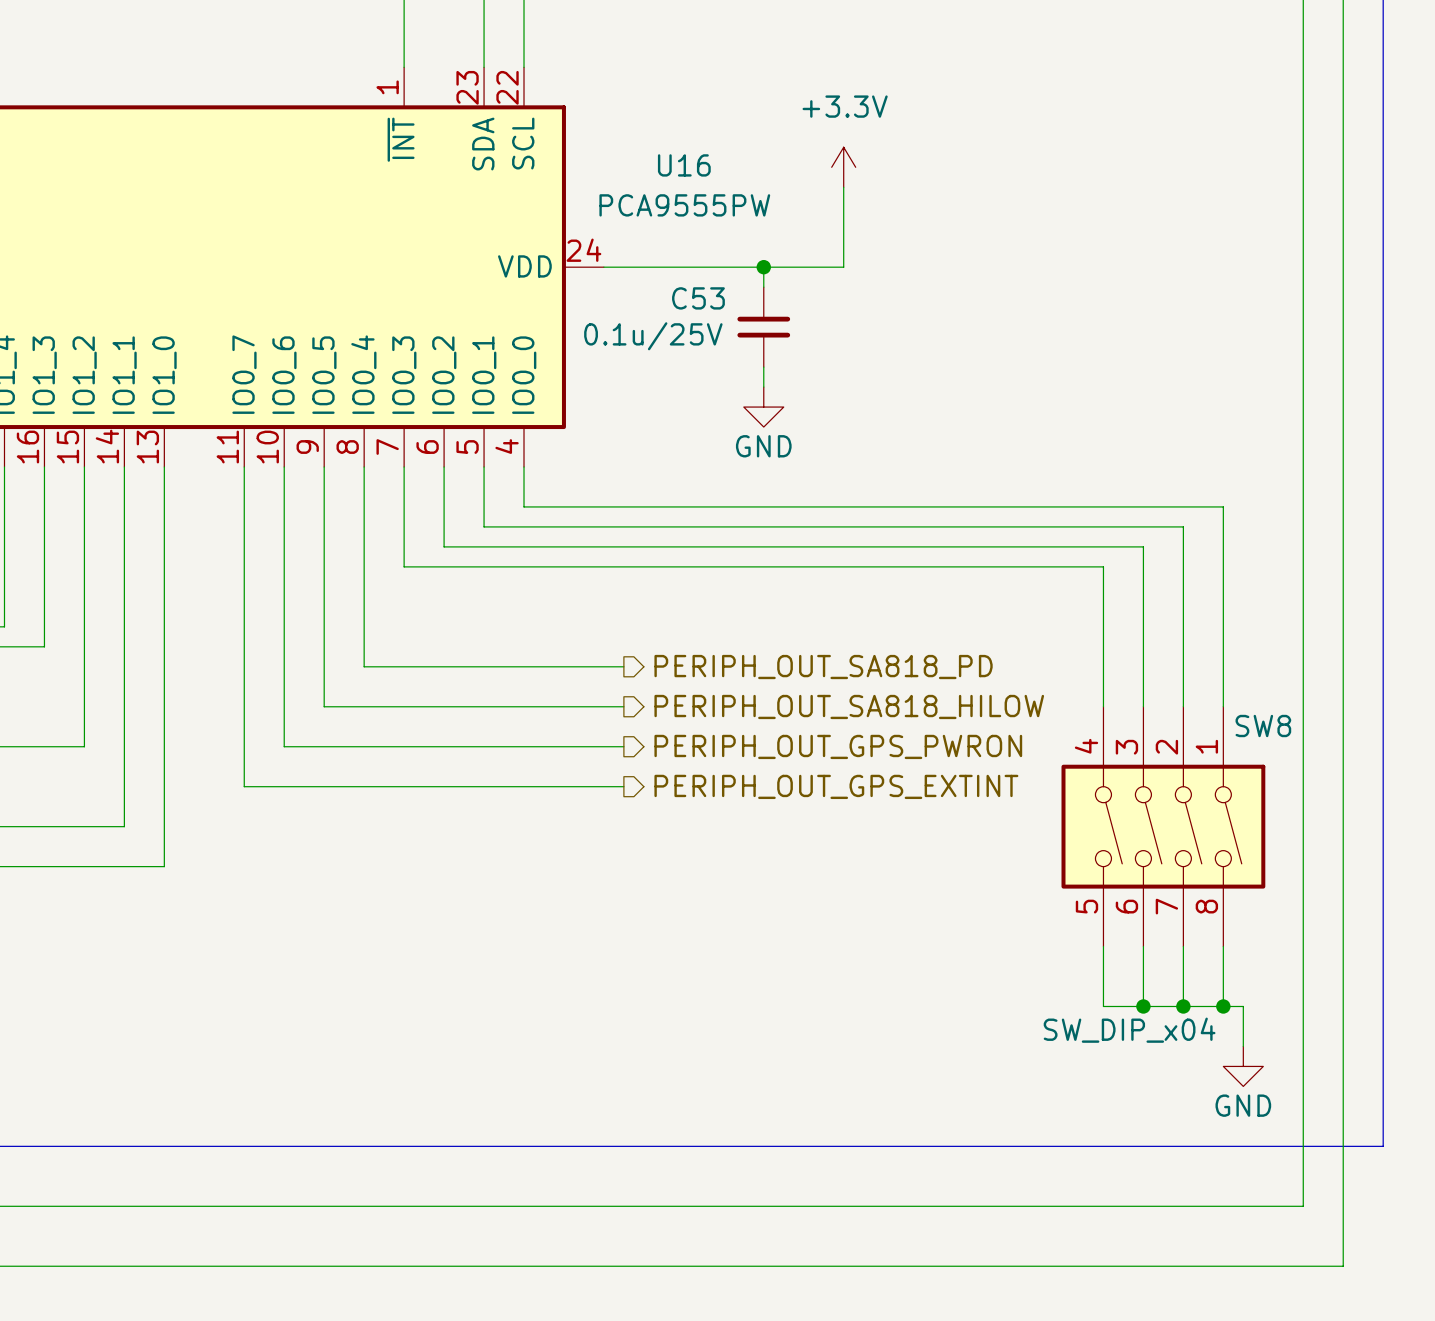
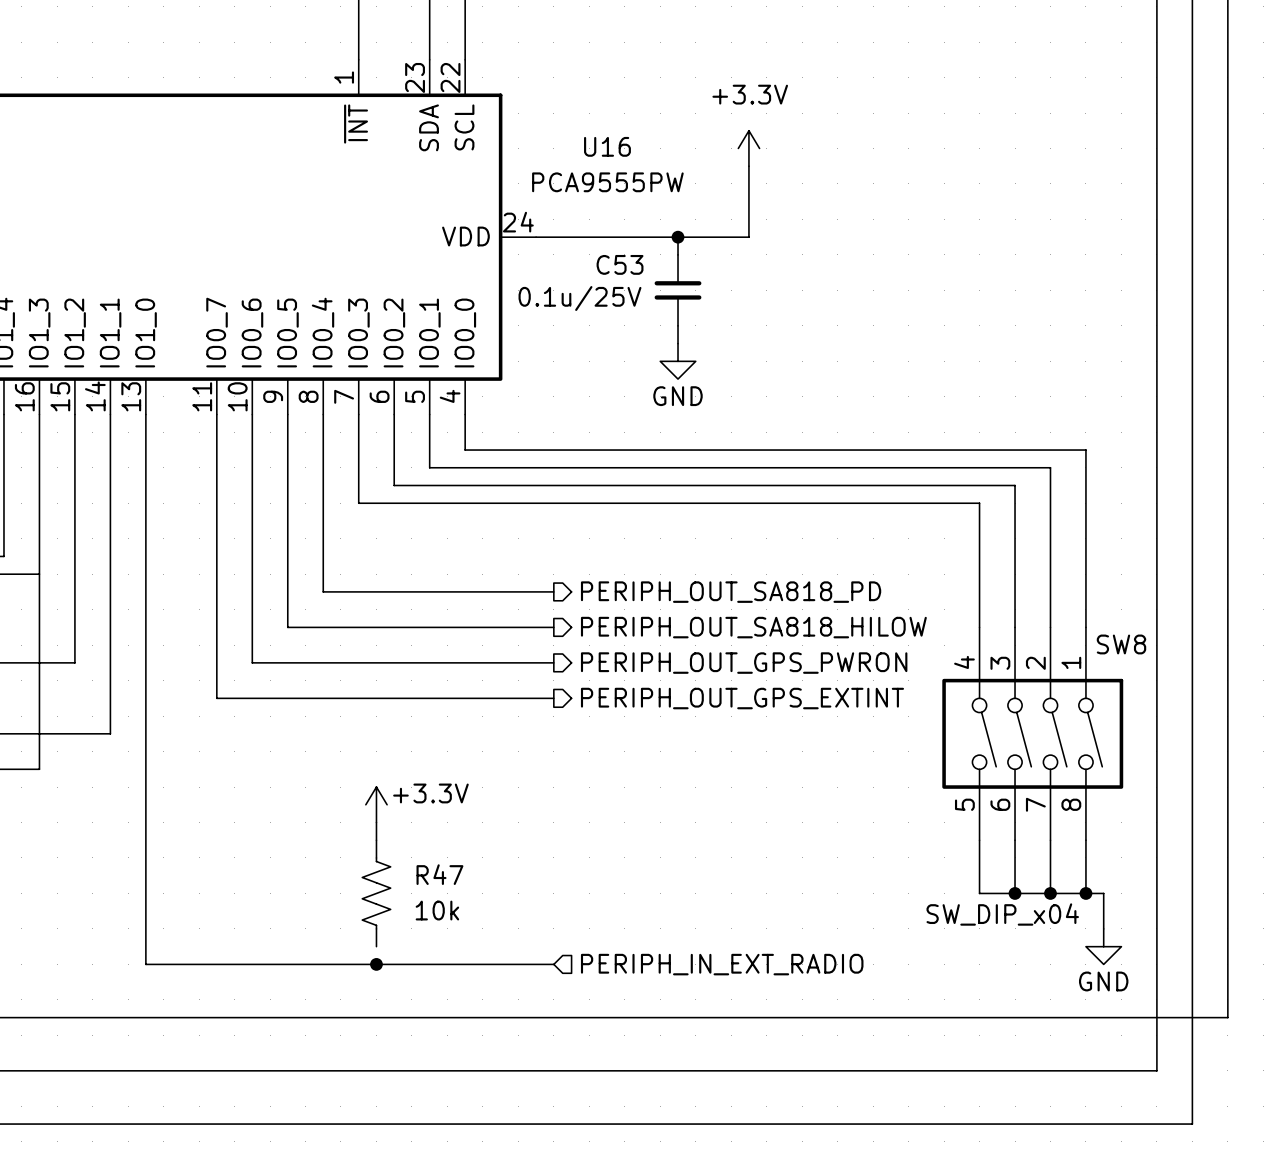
wire: (44, 866) (164, 866) -> (39, 769) (39, 574)
wire: none -> (145, 769) (145, 964) (553, 964)
power symbol: none -> +3.3V (376, 804)
wire: none -> (376, 822) (376, 840)
R47: none -> 10k (376, 893)
junction: none -> (376, 964)
hierarchical label: none -> PERIPH_IN_EXT_RADIO (722, 964)

